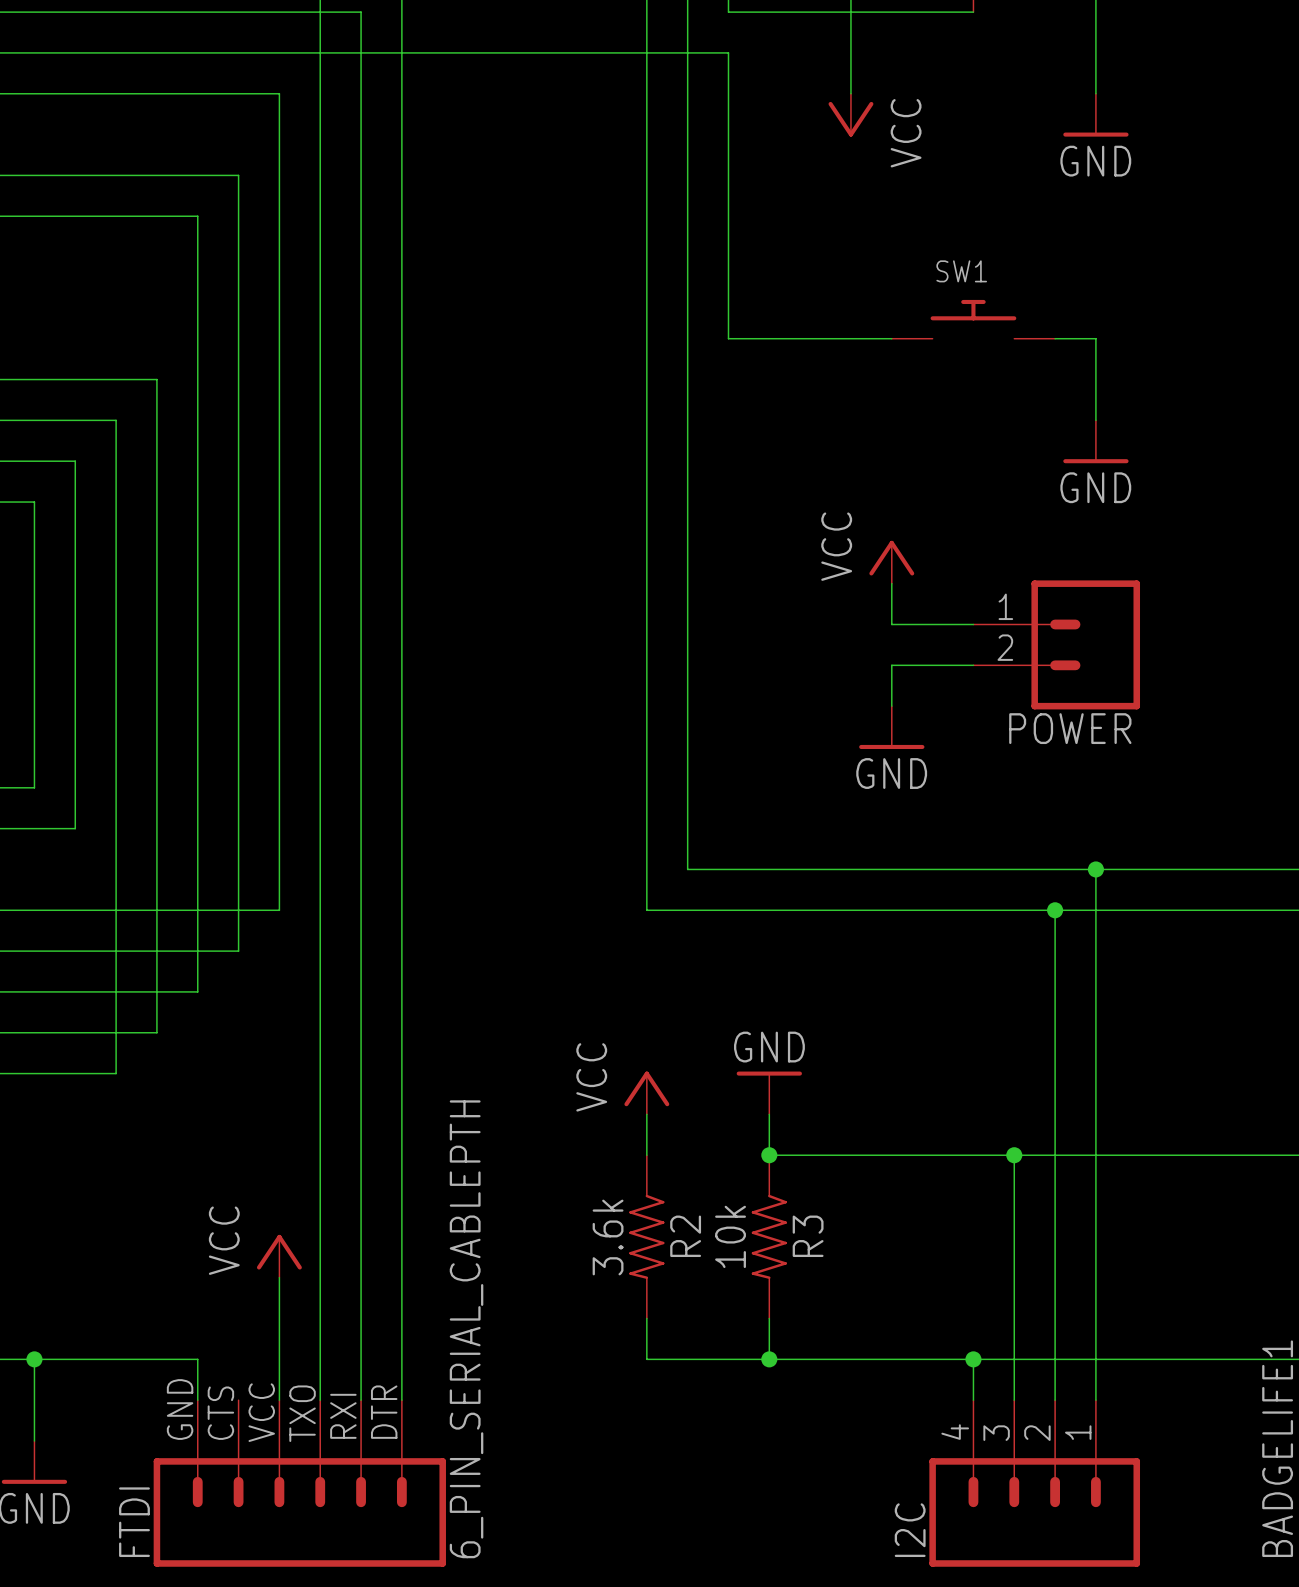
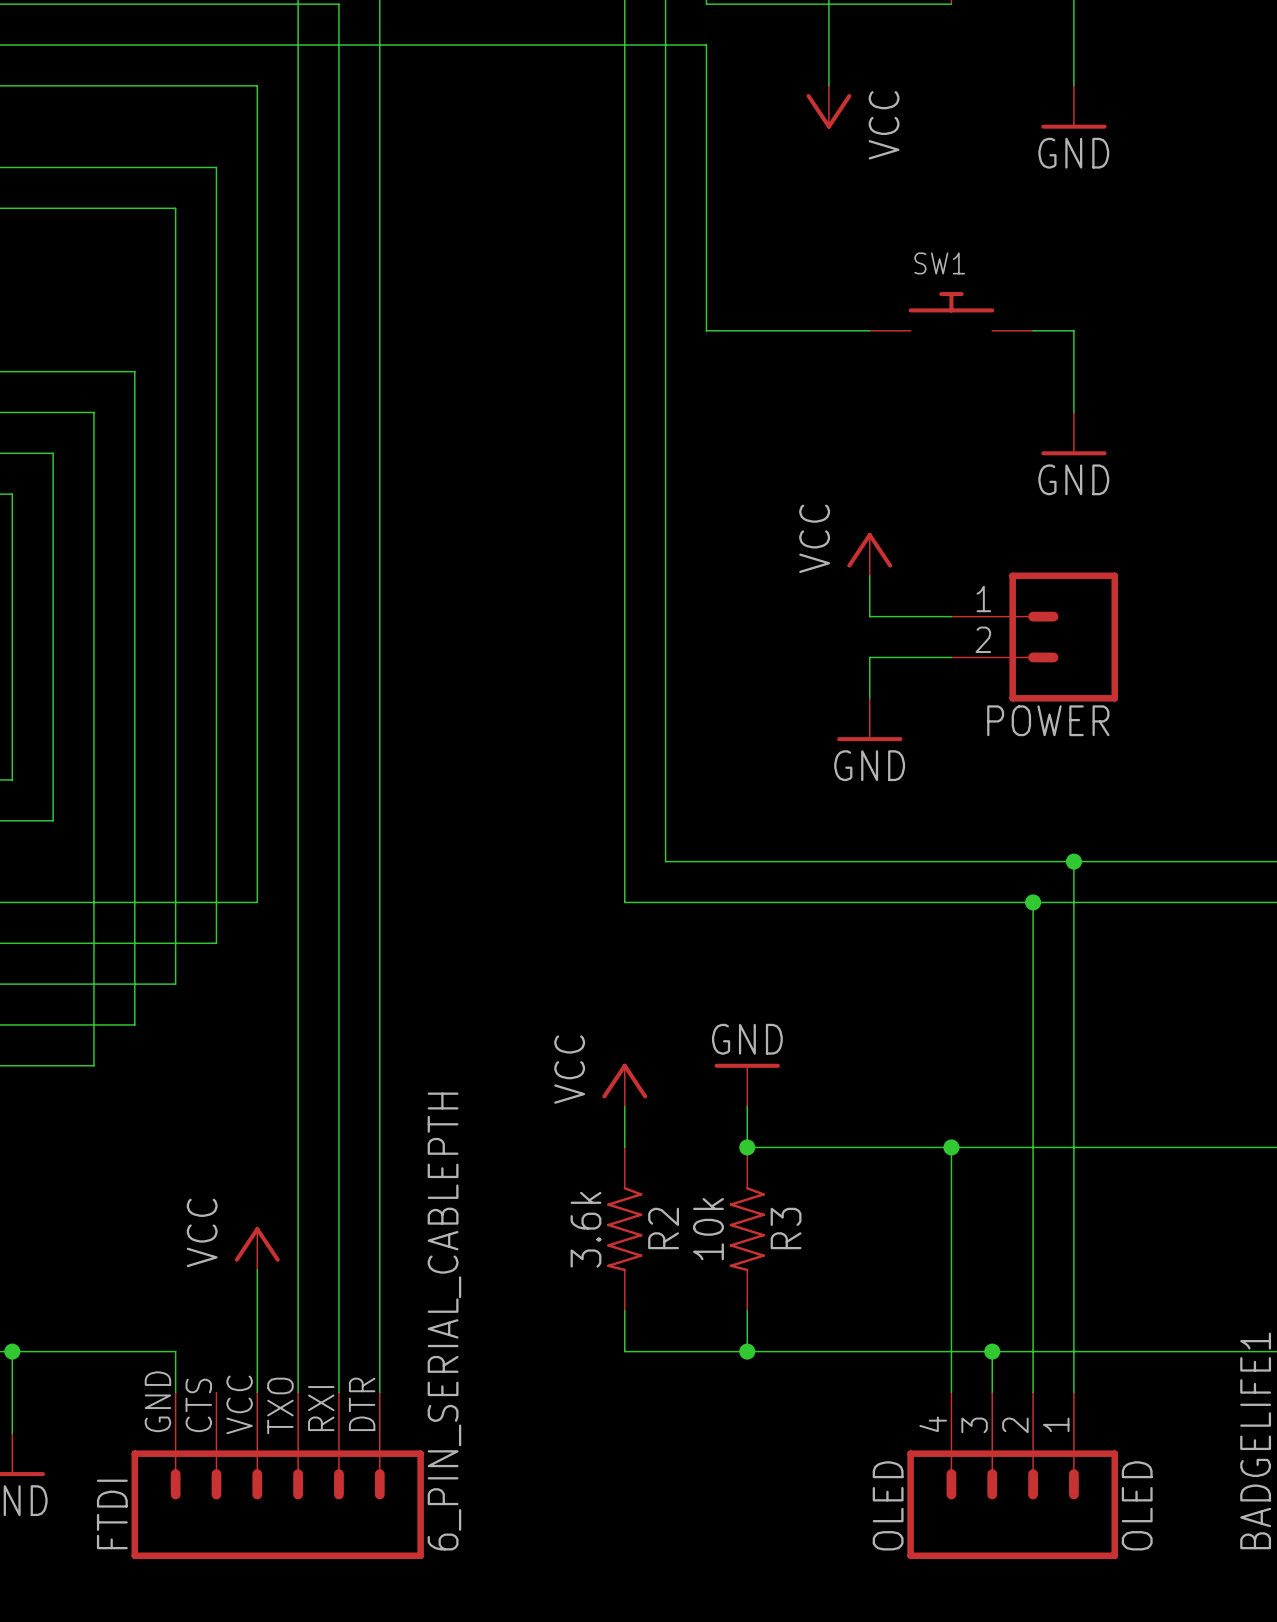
wire: (1014, 1155) (1014, 1359) -> (951, 1147) (951, 1351)
junction position: (1014, 1155) -> (951, 1147)
junction position: (973, 1359) -> (992, 1351)
I2C value: none -> OLED (1137, 1505)
I2C name: I2C (910, 1530) -> OLED (888, 1505)

